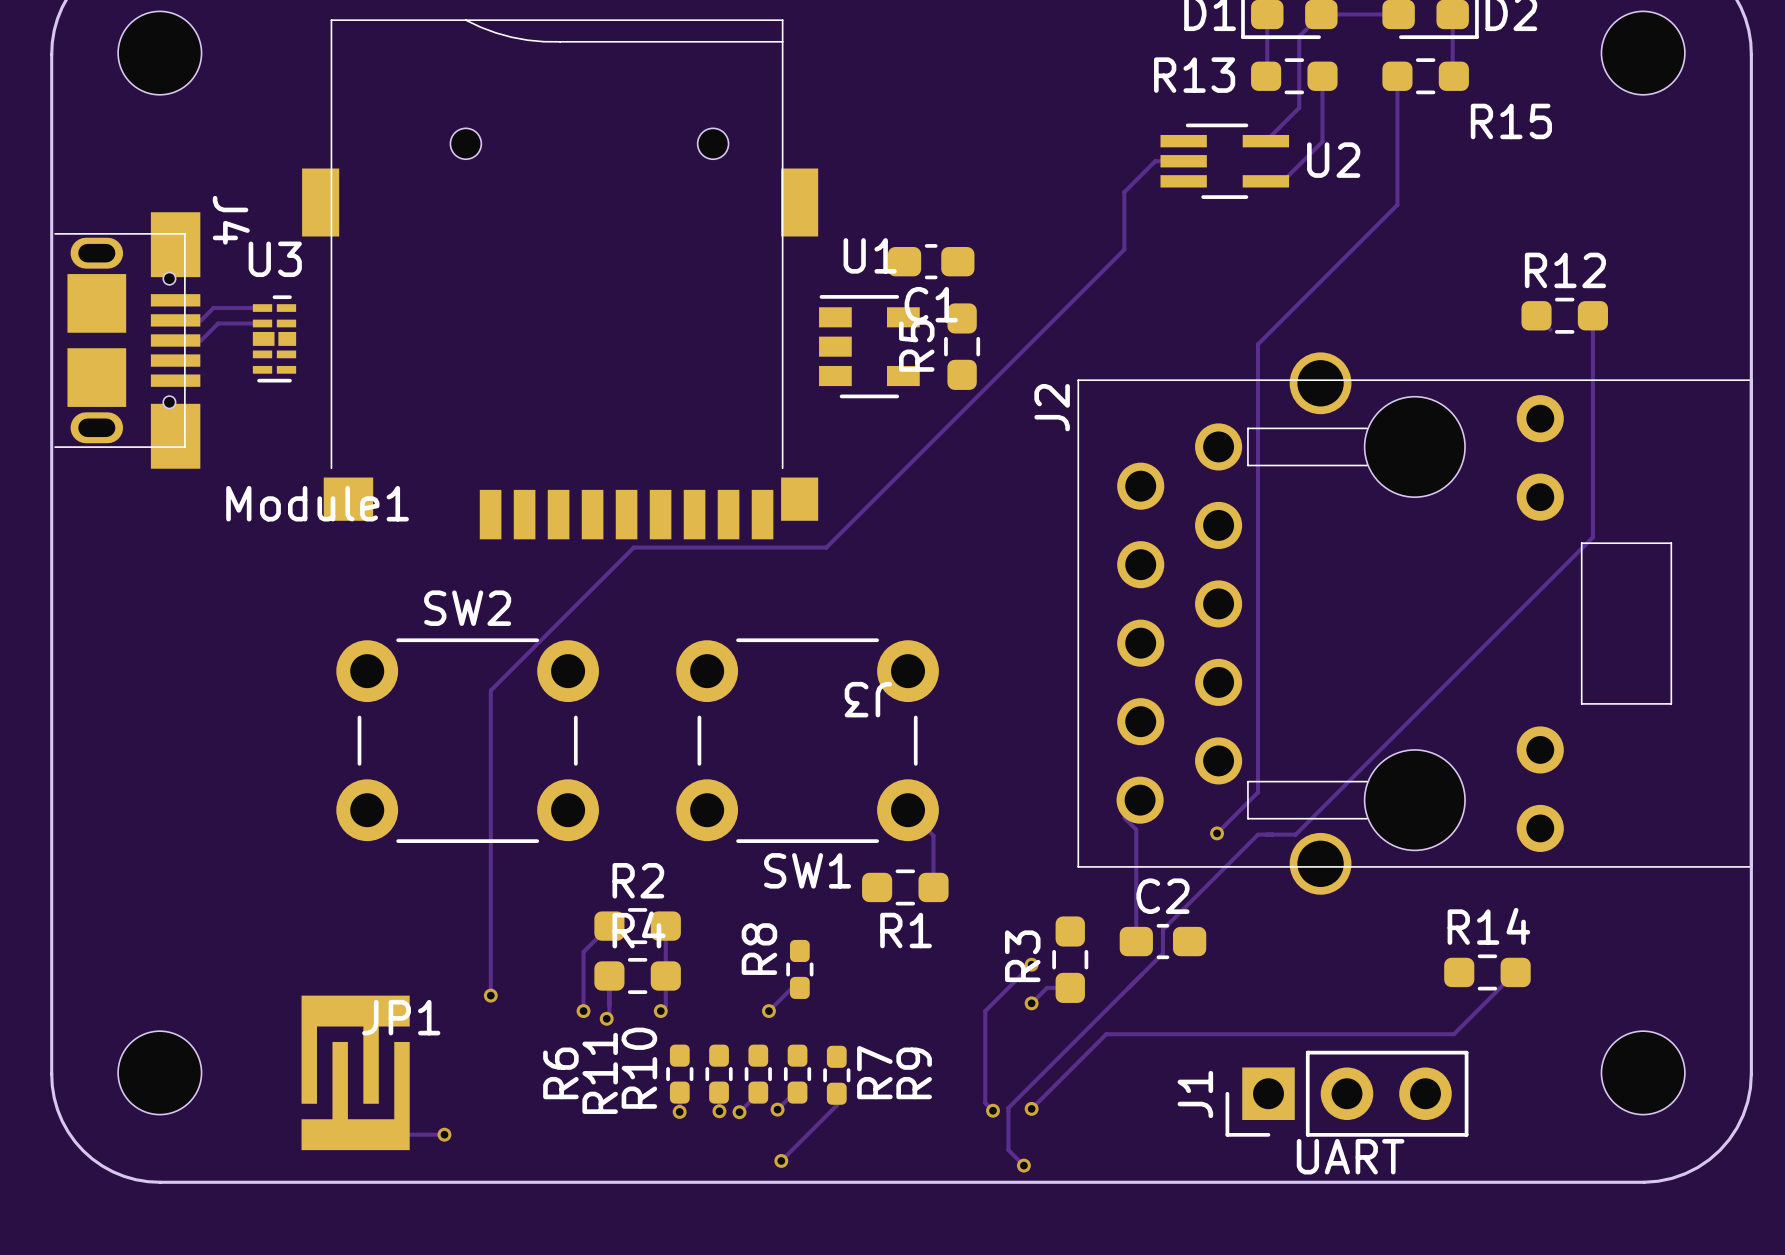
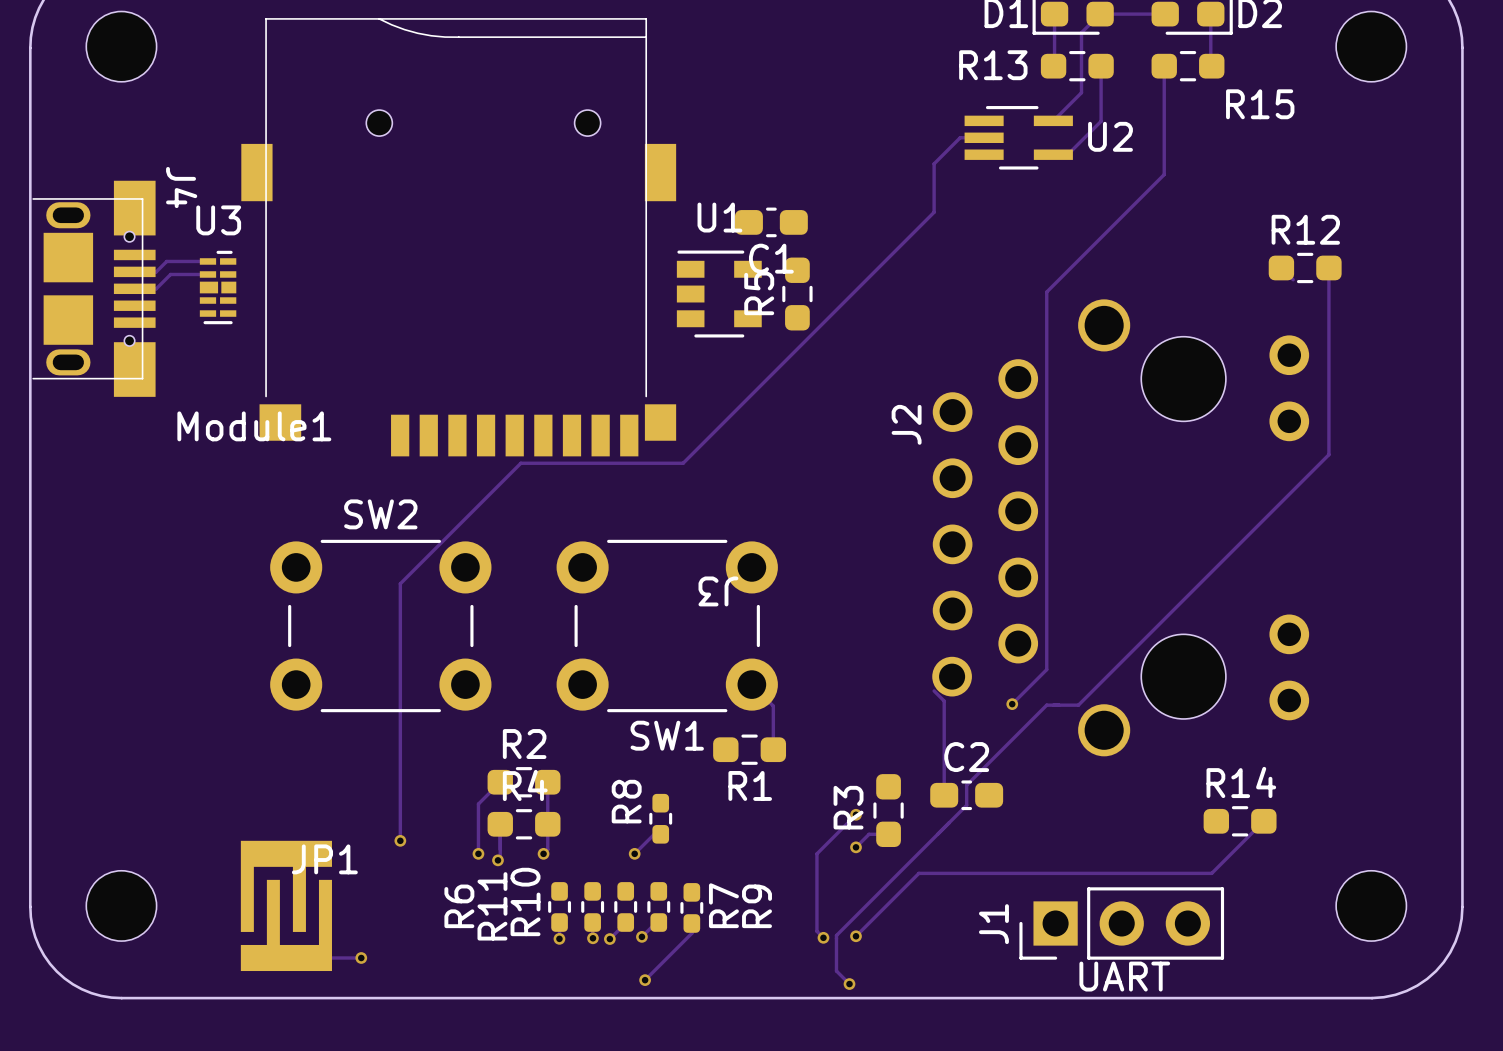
J2 footprint: [1077, 352, 1753, 895] -> [932, 299, 1310, 757]
J2 name position: J2 (1052, 407) -> J2 (906, 424)

